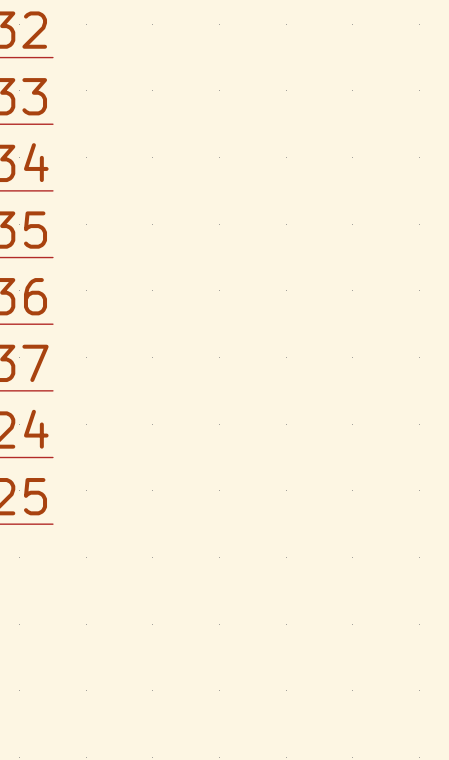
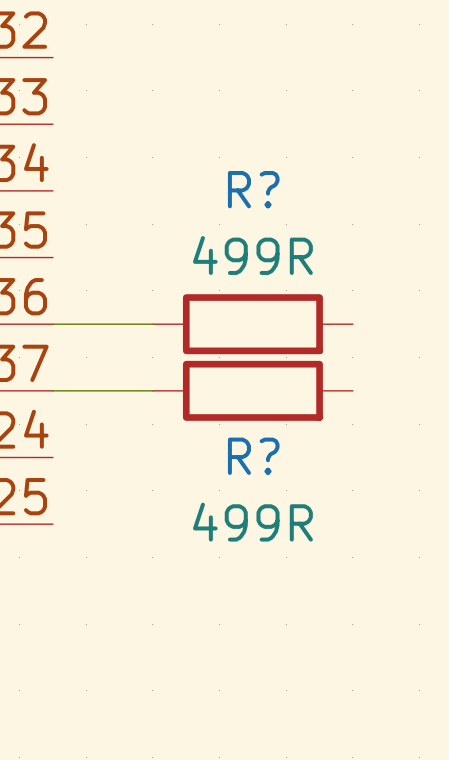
wire: none -> (52, 324) (152, 324)
R?: none -> 499R (252, 324)
wire: none -> (52, 390) (152, 390)
R?: none -> 499R (252, 390)

